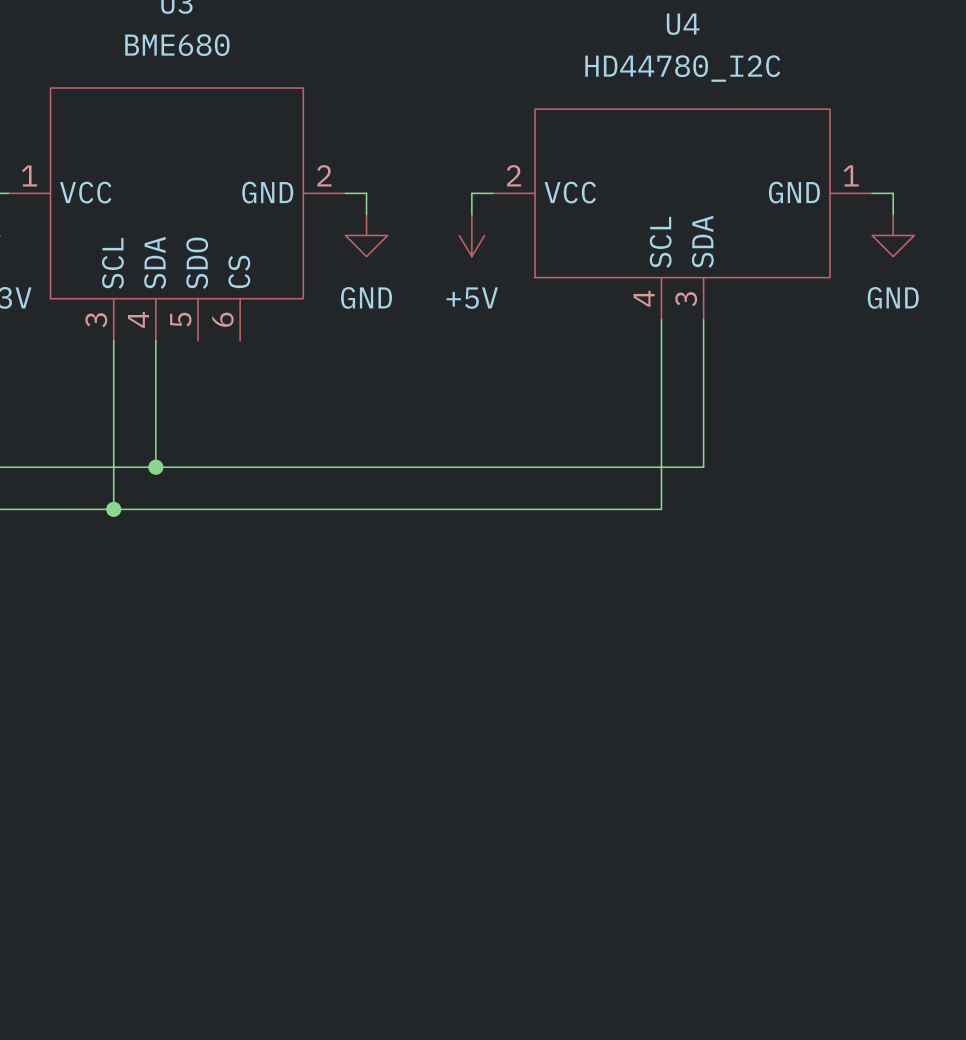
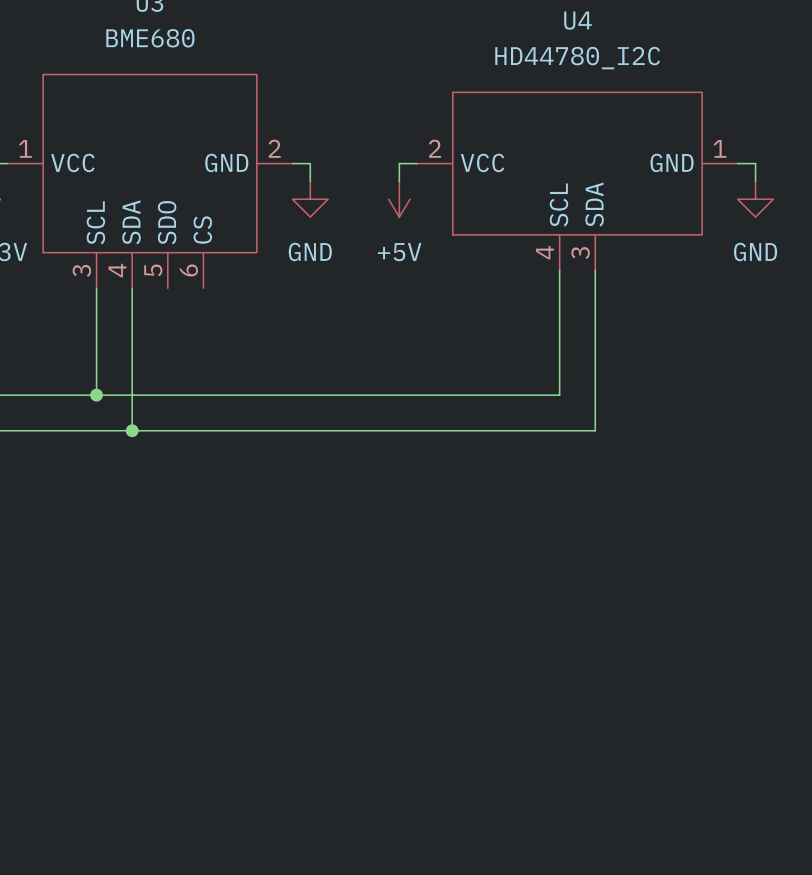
wire: (113, 467) (113, 509) -> (132, 395) (132, 430)
junction: none -> (96, 395)
junction: (155, 467) -> none
wire: (703, 467) (661, 467) (661, 509) -> (595, 395) (595, 430) (559, 430)
junction: (113, 509) -> none
junction: none -> (132, 430)

